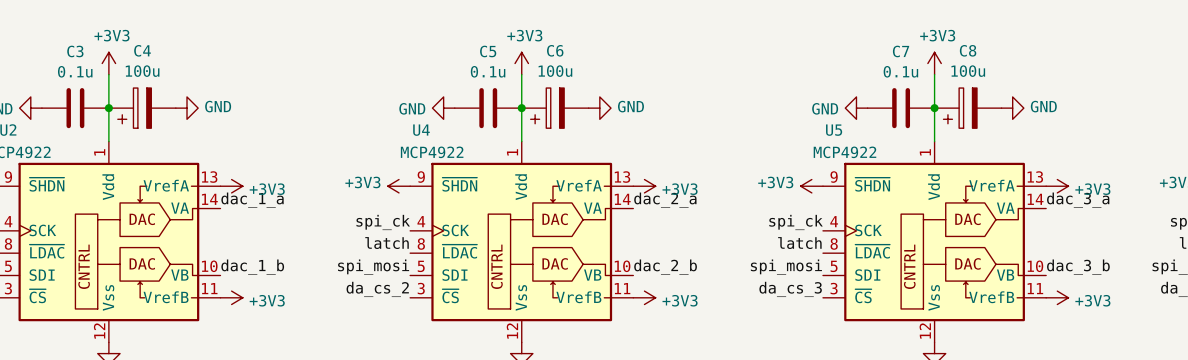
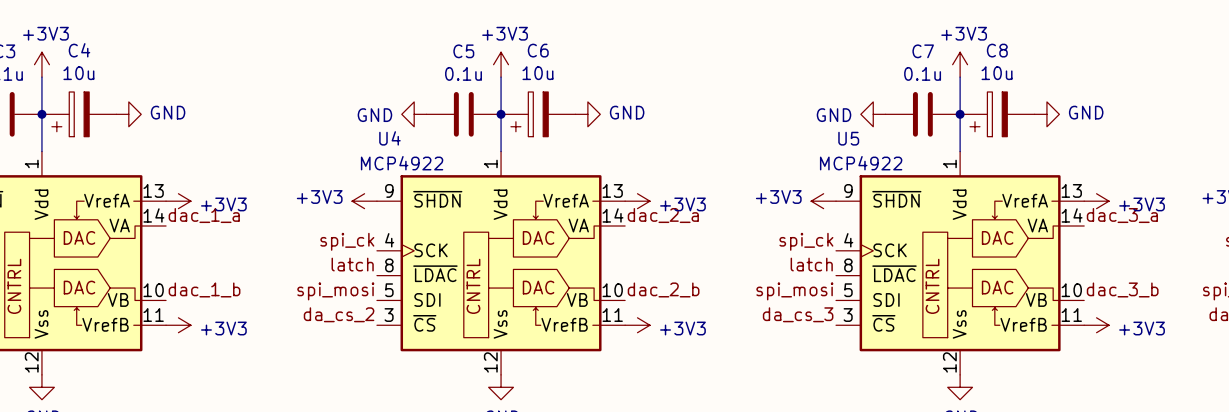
C4 value: 100u (142, 71) -> 10u (78, 73)
C6 value: 100u (555, 71) -> 10u (537, 73)
C8 value: 100u (968, 71) -> 10u (997, 73)

